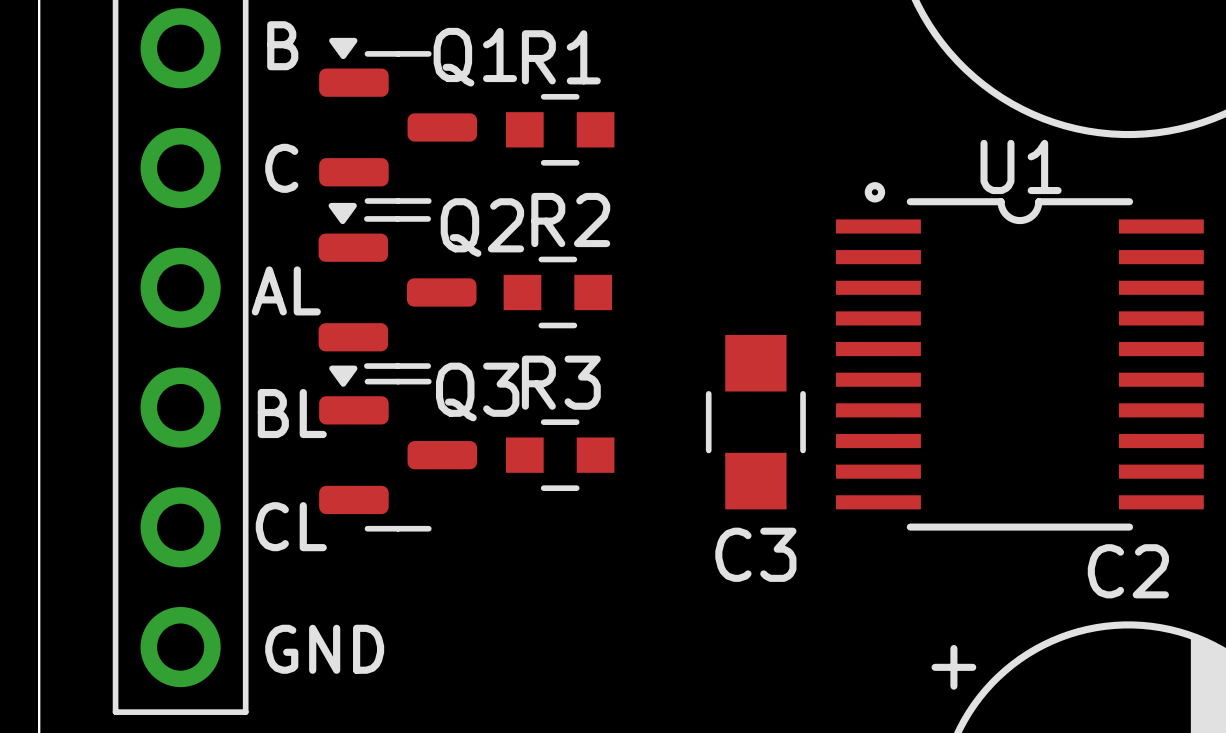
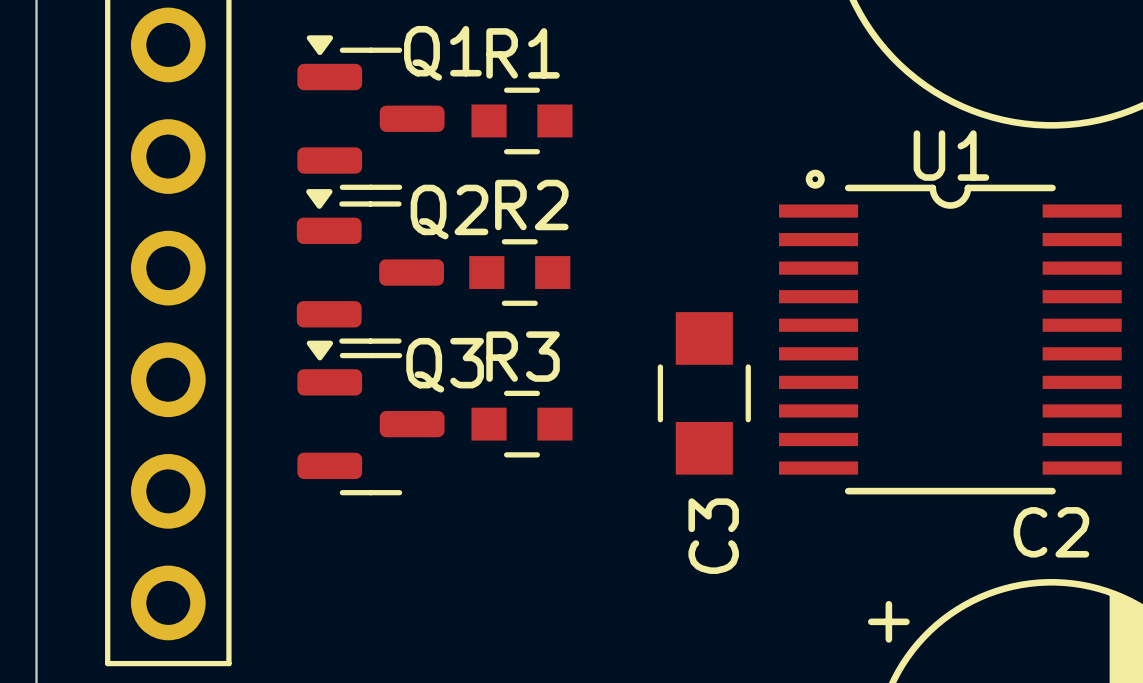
text: B (282, 45) -> none
text: C (281, 168) -> none
text: AL (286, 290) -> none
text: BL (292, 413) -> none
text: CL (291, 526) -> none
C3 name rotation: 0° (755, 554) -> 90° counterclockwise (713, 536)
text: GND (324, 649) -> none

